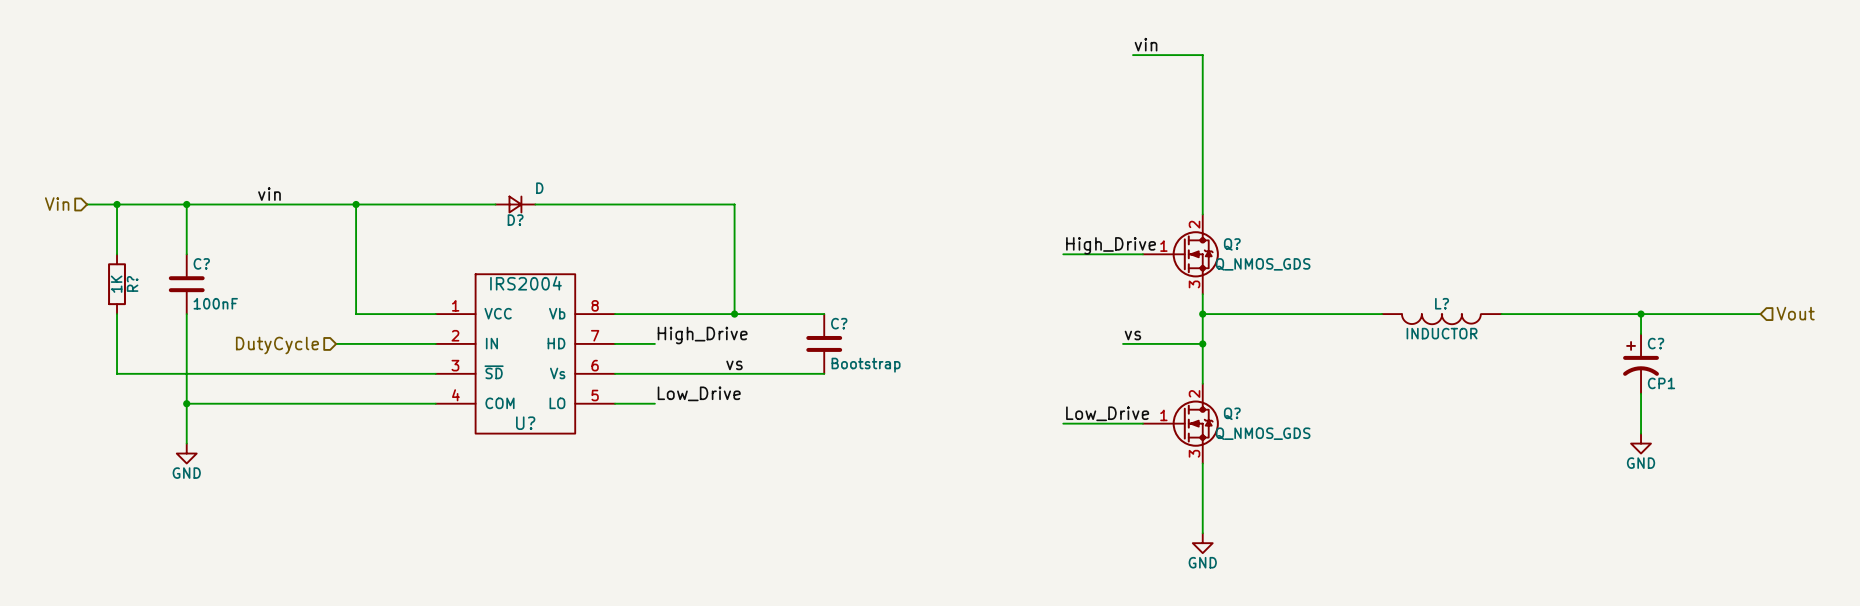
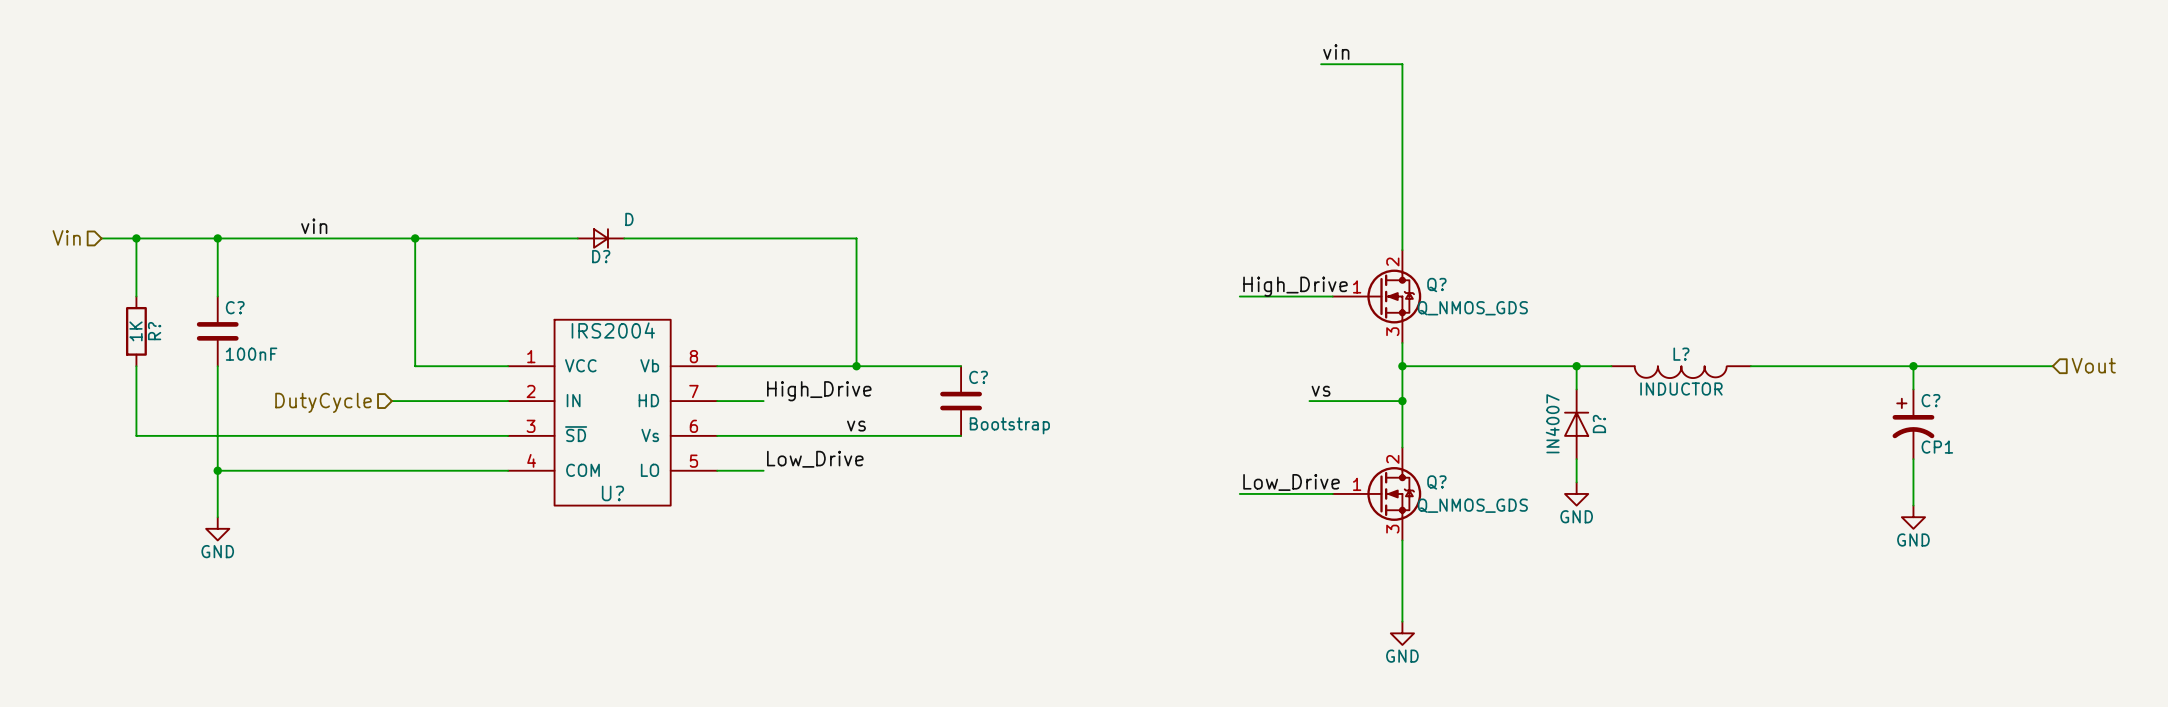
wire: none -> (1576, 366) (1576, 389)
junction: none -> (1576, 366)
D?: none -> IN4007 (1576, 424)
wire: none -> (1576, 459) (1576, 482)
power symbol: none -> GND (1576, 493)

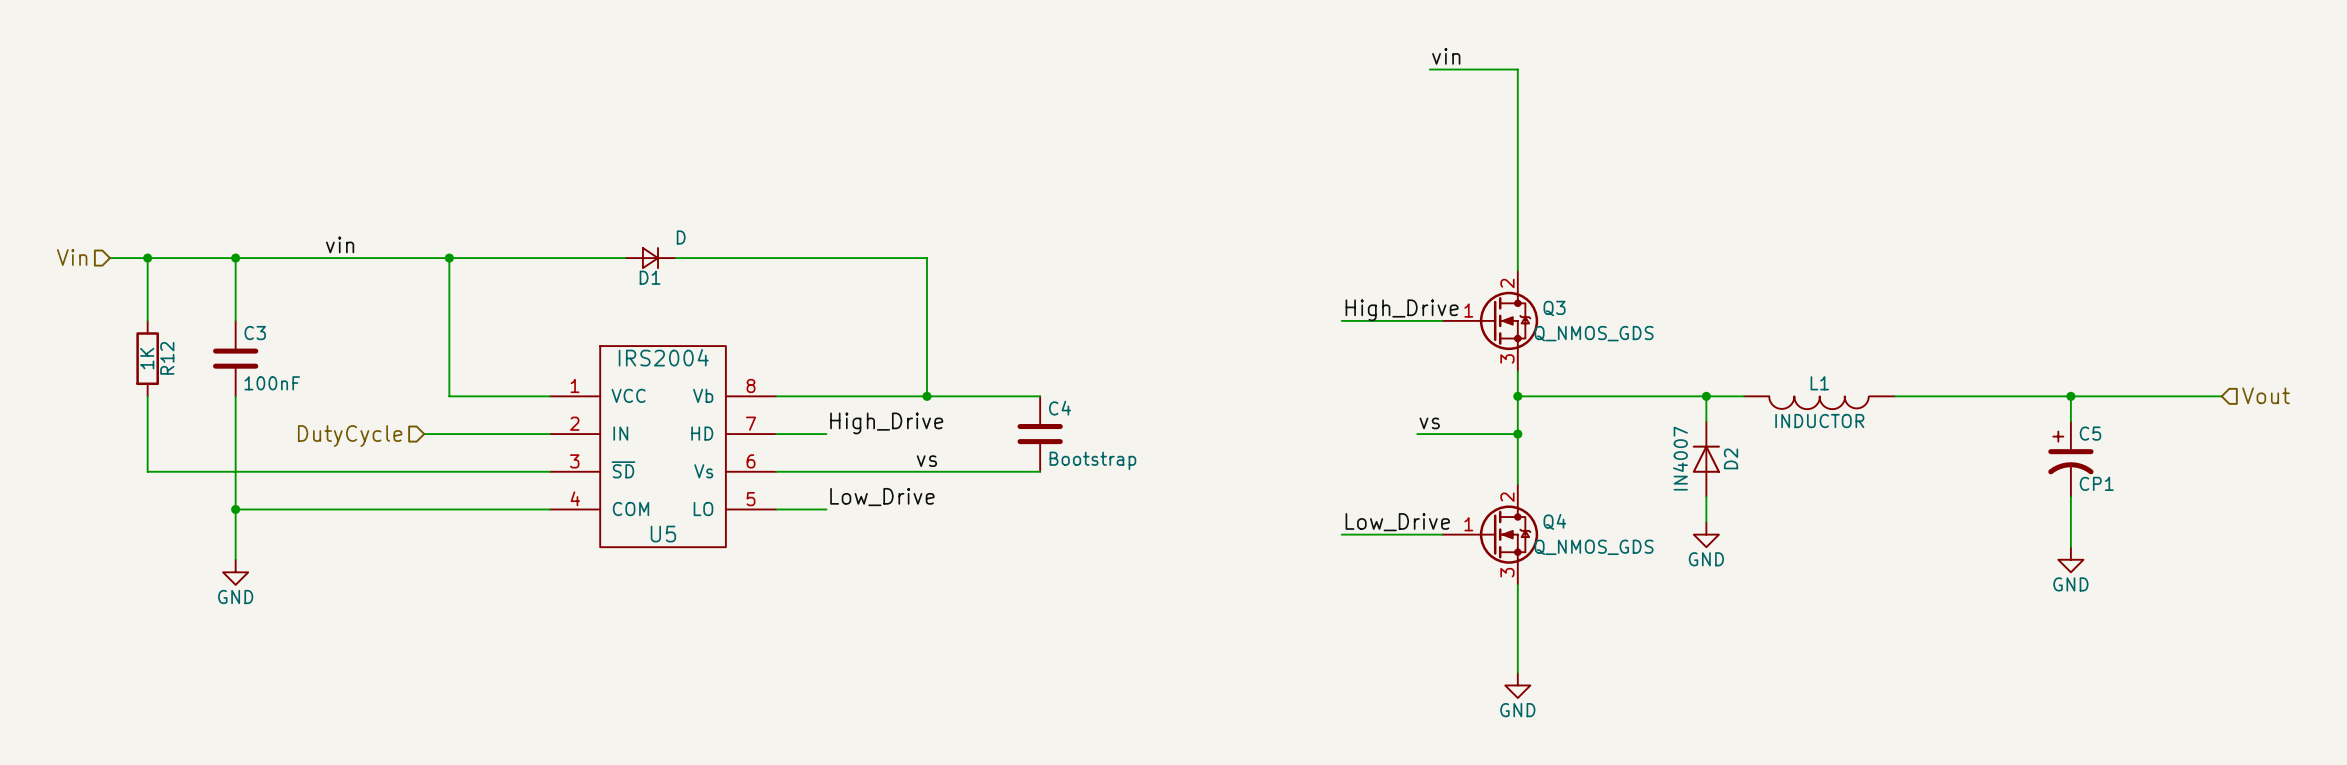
D? name: D? (601, 256) -> D1 (650, 277)
Q? name: Q? (1436, 285) -> Q3 (1554, 308)
C? name: C? (235, 307) -> C3 (255, 333)
R? name: R? (154, 331) -> R12 (167, 358)
L? name: L? (1681, 354) -> L1 (1819, 383)
C? name: C? (978, 377) -> C4 (1059, 408)
C? name: C? (1930, 400) -> C5 (2090, 433)
D? name: D? (1599, 424) -> D2 (1731, 458)
Q? name: Q? (1436, 482) -> Q4 (1554, 521)
U? name: U? (612, 493) -> U5 (663, 534)

